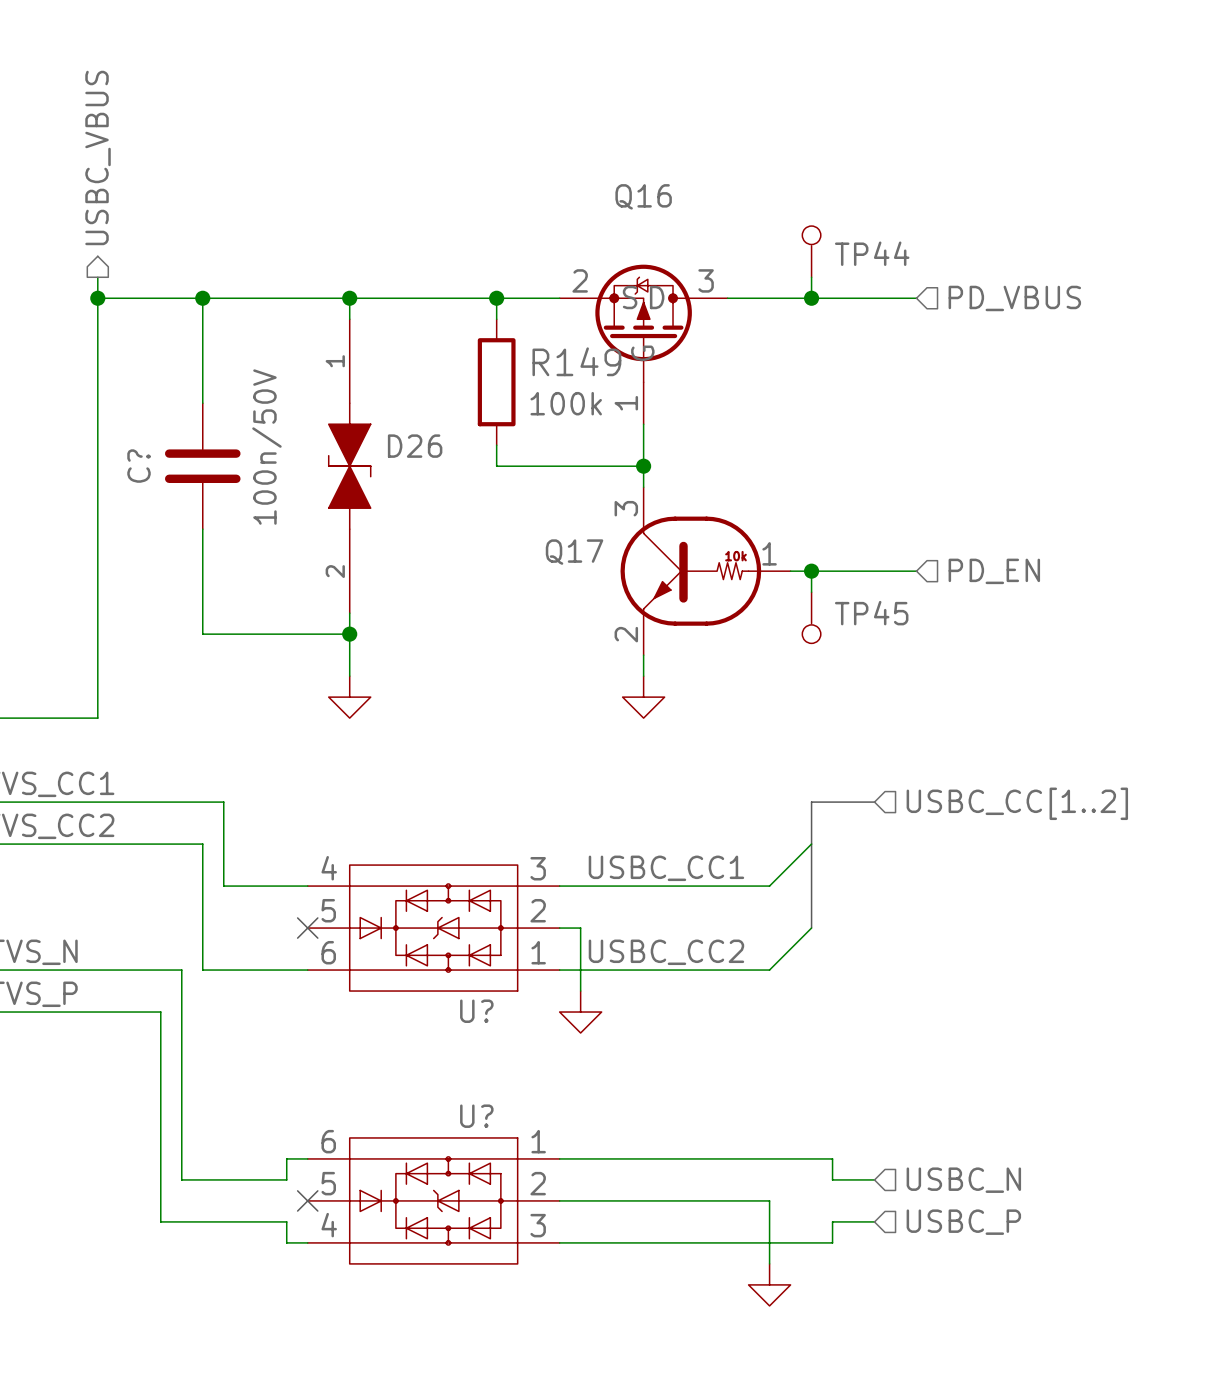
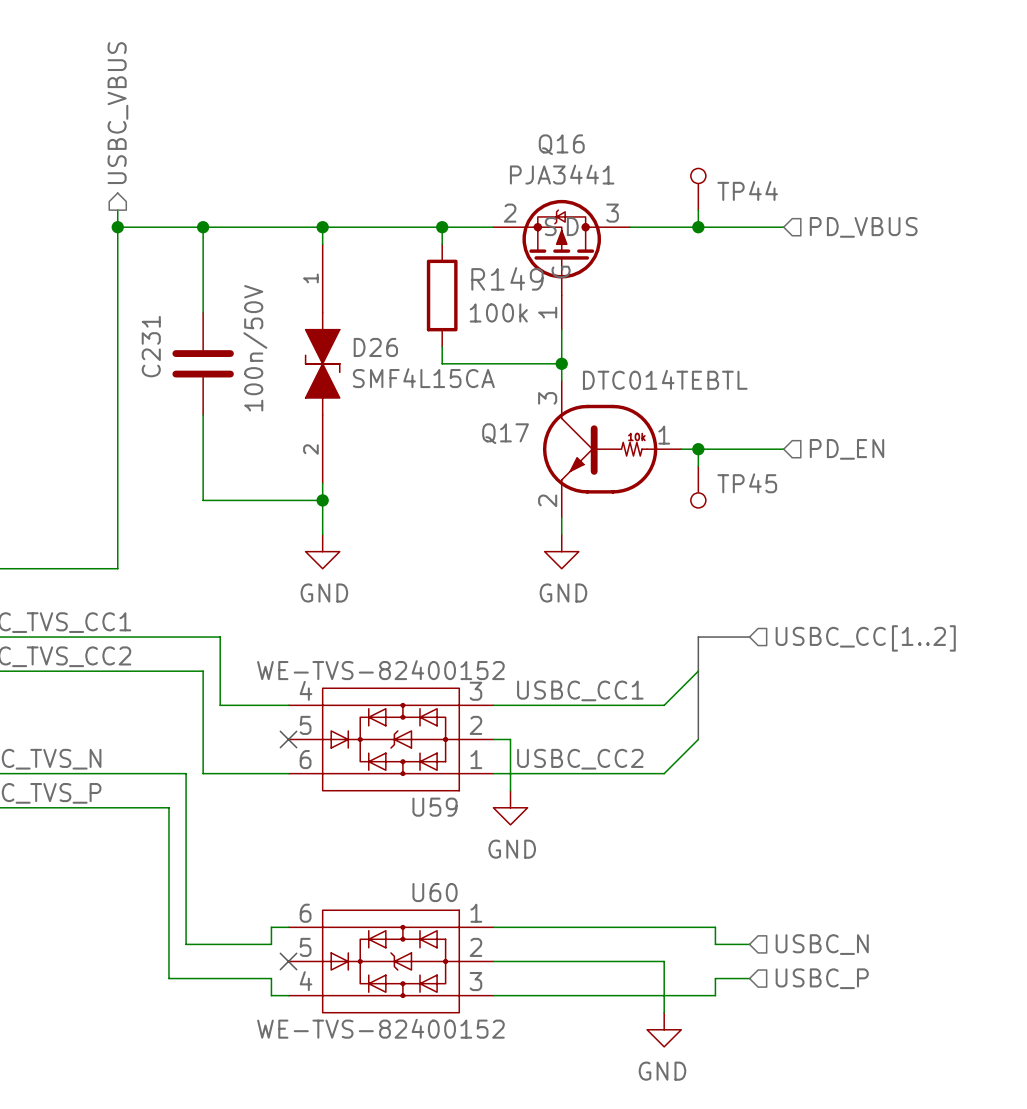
Q16 value: none -> PJA3441 (562, 174)
C? name: C? (139, 466) -> C231 (151, 346)
D26 value: none -> SMF4L15CA (423, 378)
Q17 value: none -> DTC014TEBTL (665, 379)
power symbol text: none -> GND (324, 593)
power symbol text: none -> GND (563, 593)
U? value: none -> WE-TVS-82400152 (380, 670)
U? name: U? (476, 1011) -> U59 (435, 807)
power symbol text: none -> GND (512, 849)
U? name: U? (476, 1116) -> U60 (435, 892)
U? value: none -> WE-TVS-82400152 (380, 1028)
power symbol text: none -> GND (662, 1071)

